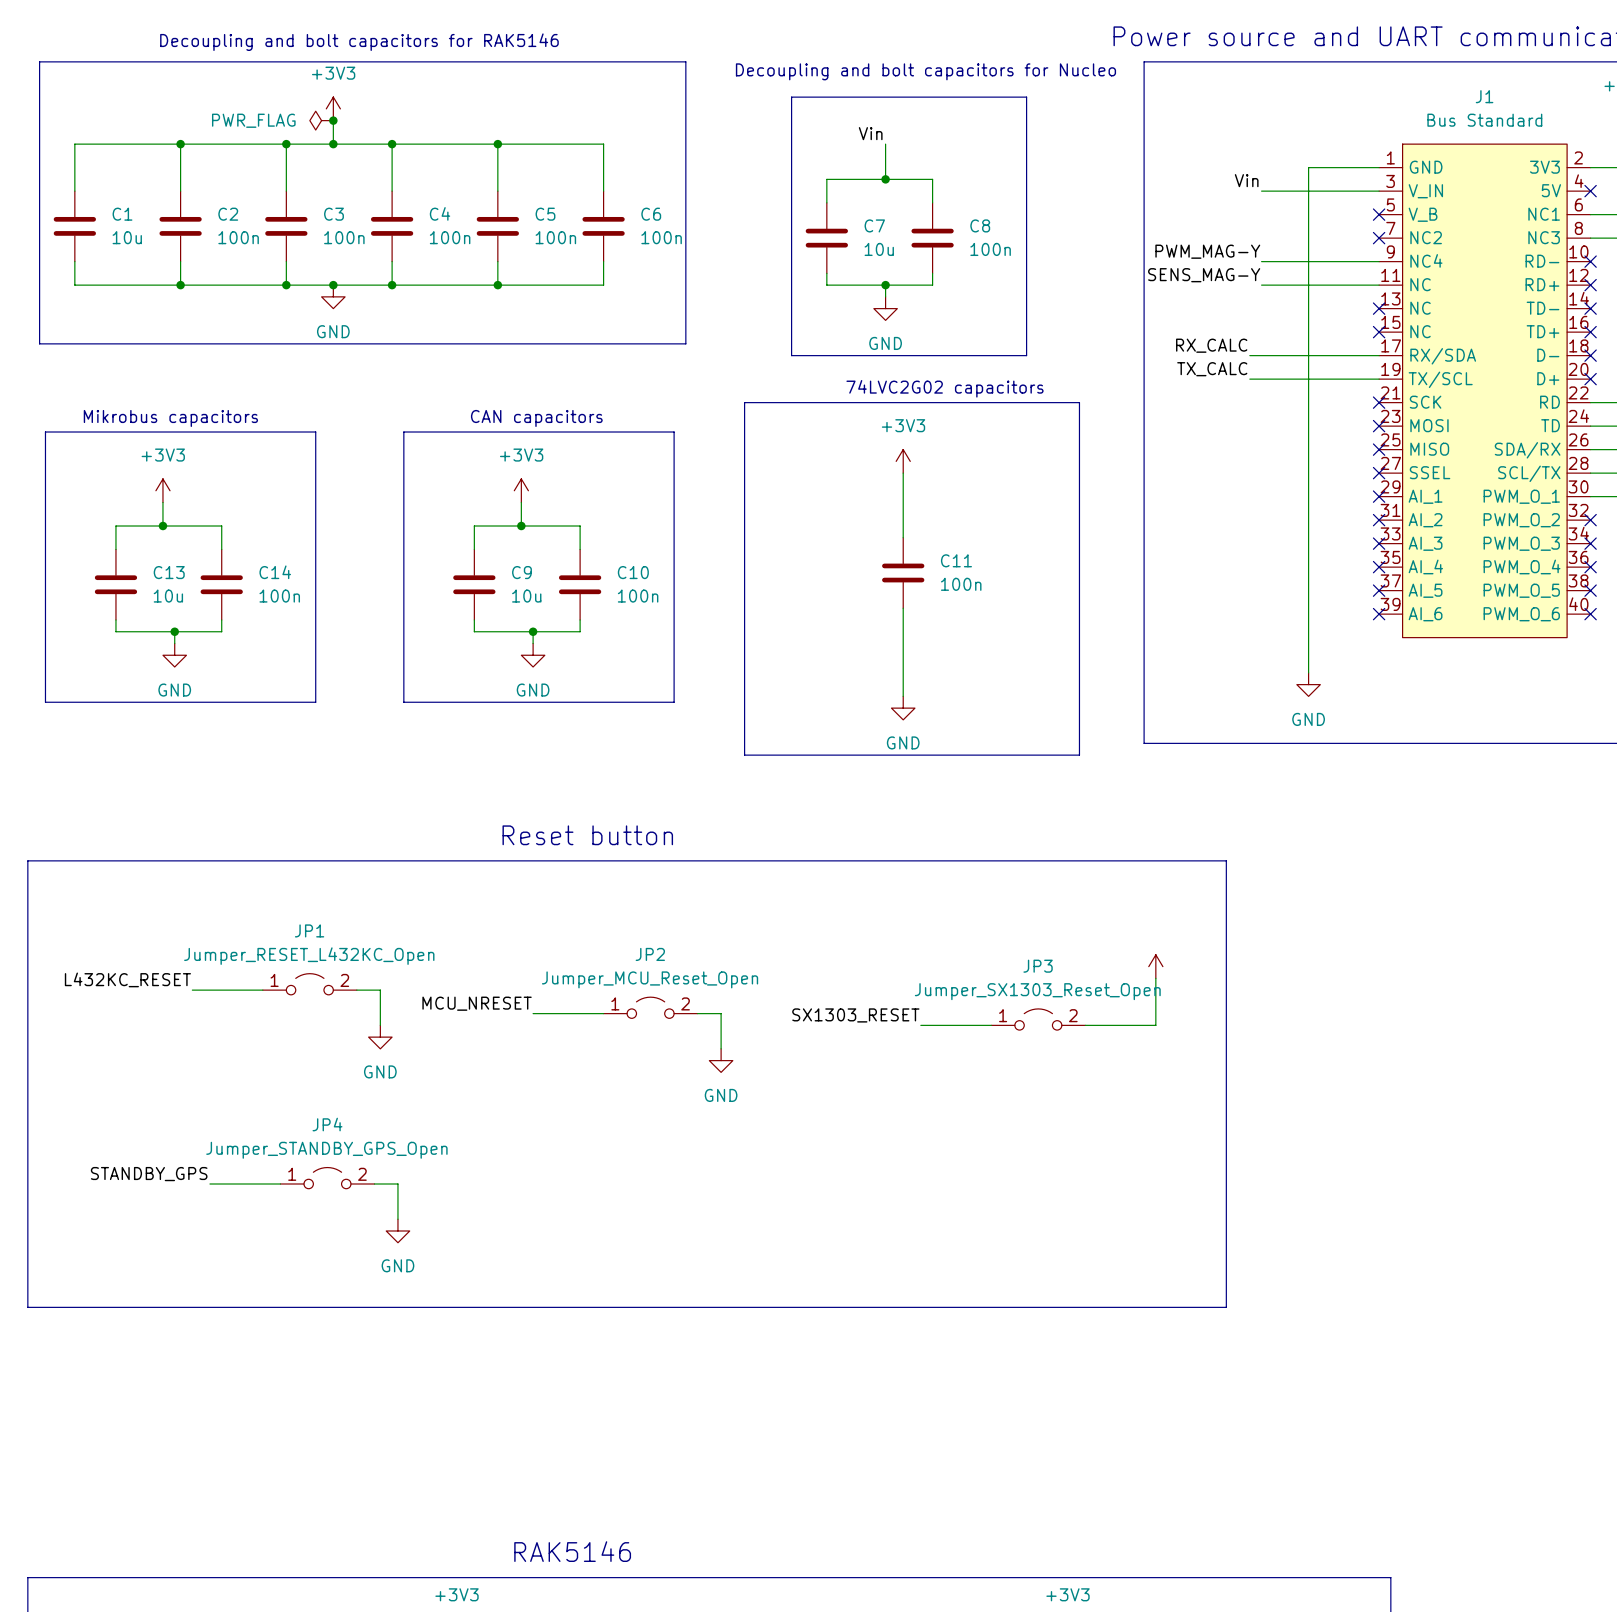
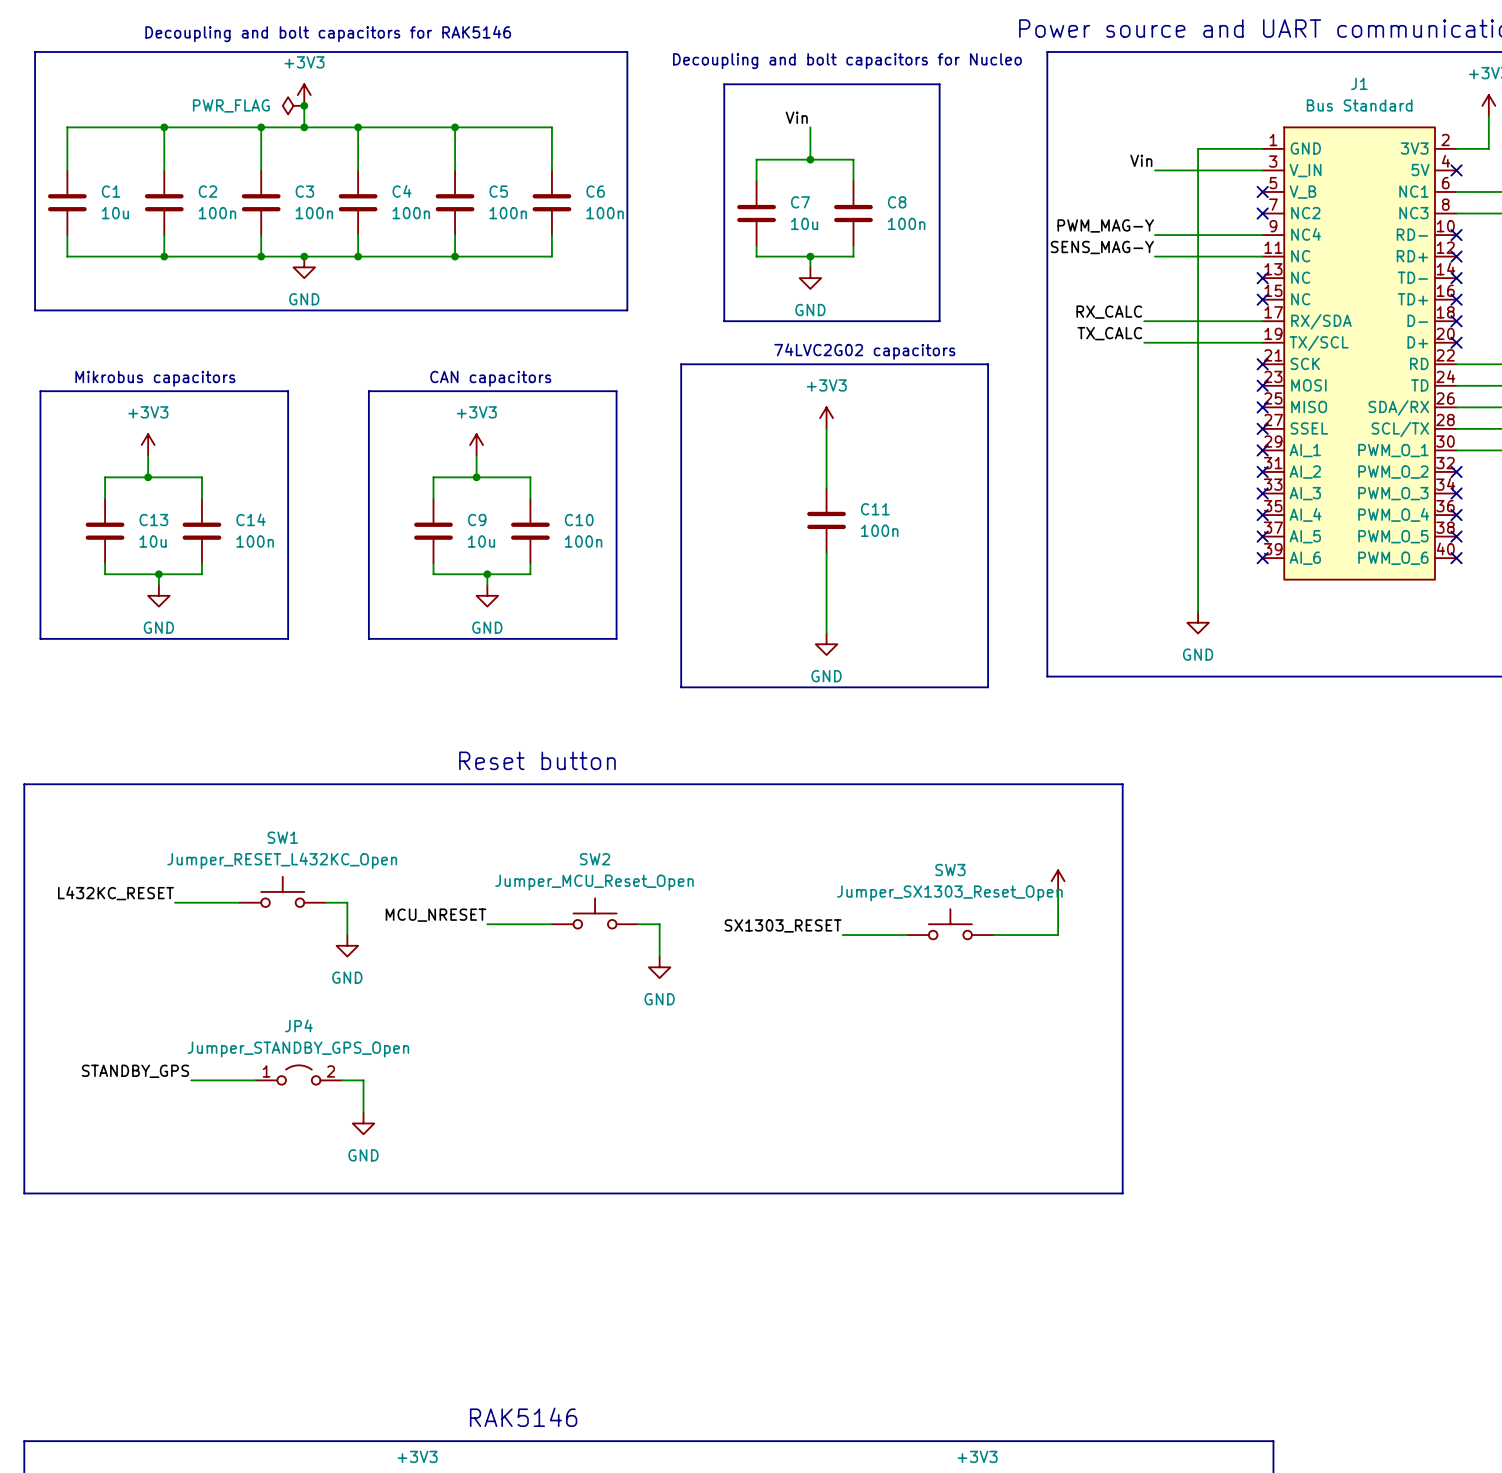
SW1: none -> Jumper_RESET_L432KC_Open (282, 891)
JP1: Jumper_RESET_L432KC_Open (309, 984) -> none
SW2: none -> Jumper_MCU_Reset_Open (595, 913)
JP2: Jumper_MCU_Reset_Open (650, 1007) -> none
SW3: none -> Jumper_SX1303_Reset_Open (950, 924)
JP3: Jumper_SX1303_Reset_Open (1038, 1019) -> none

